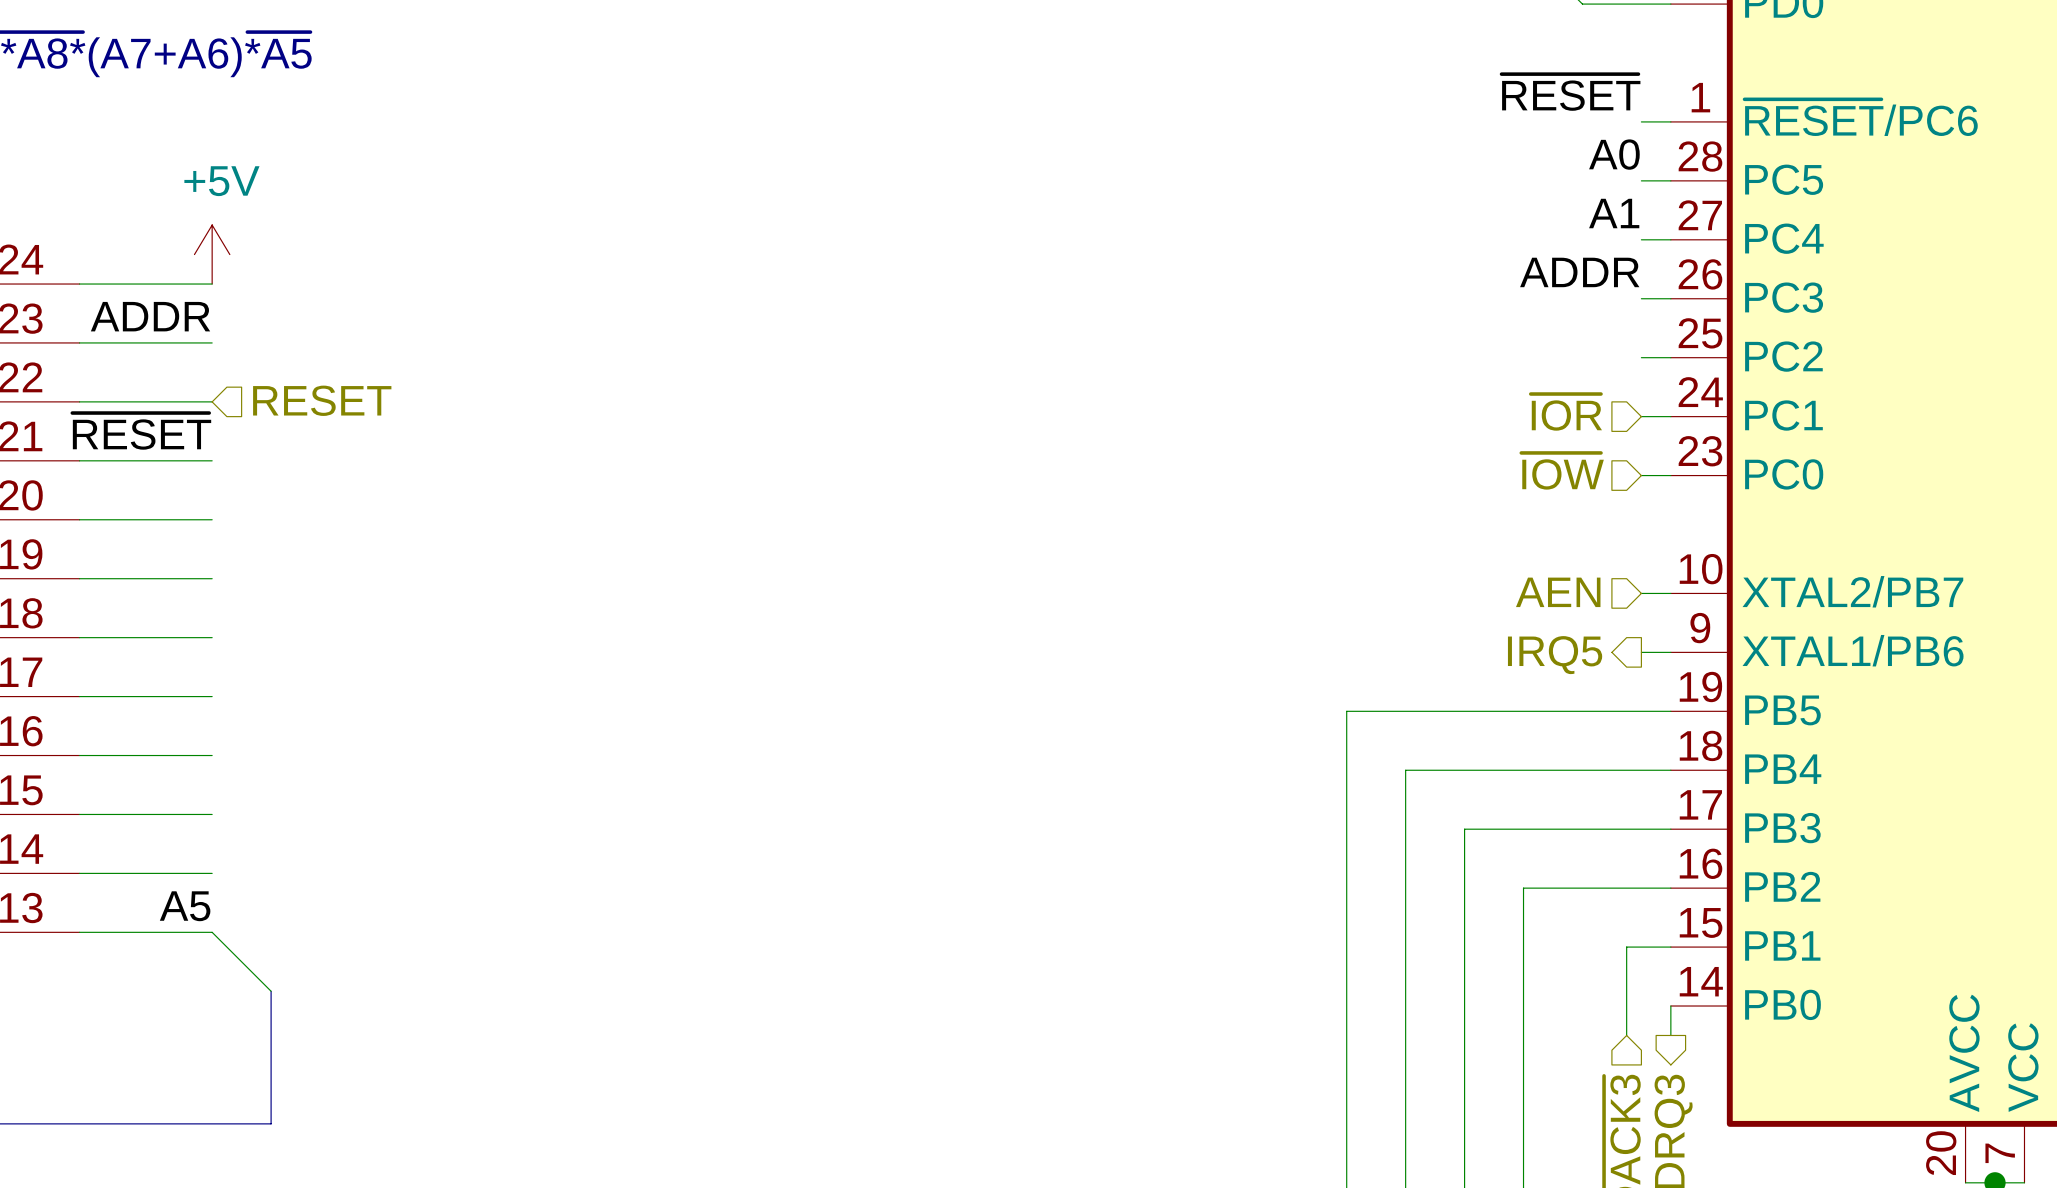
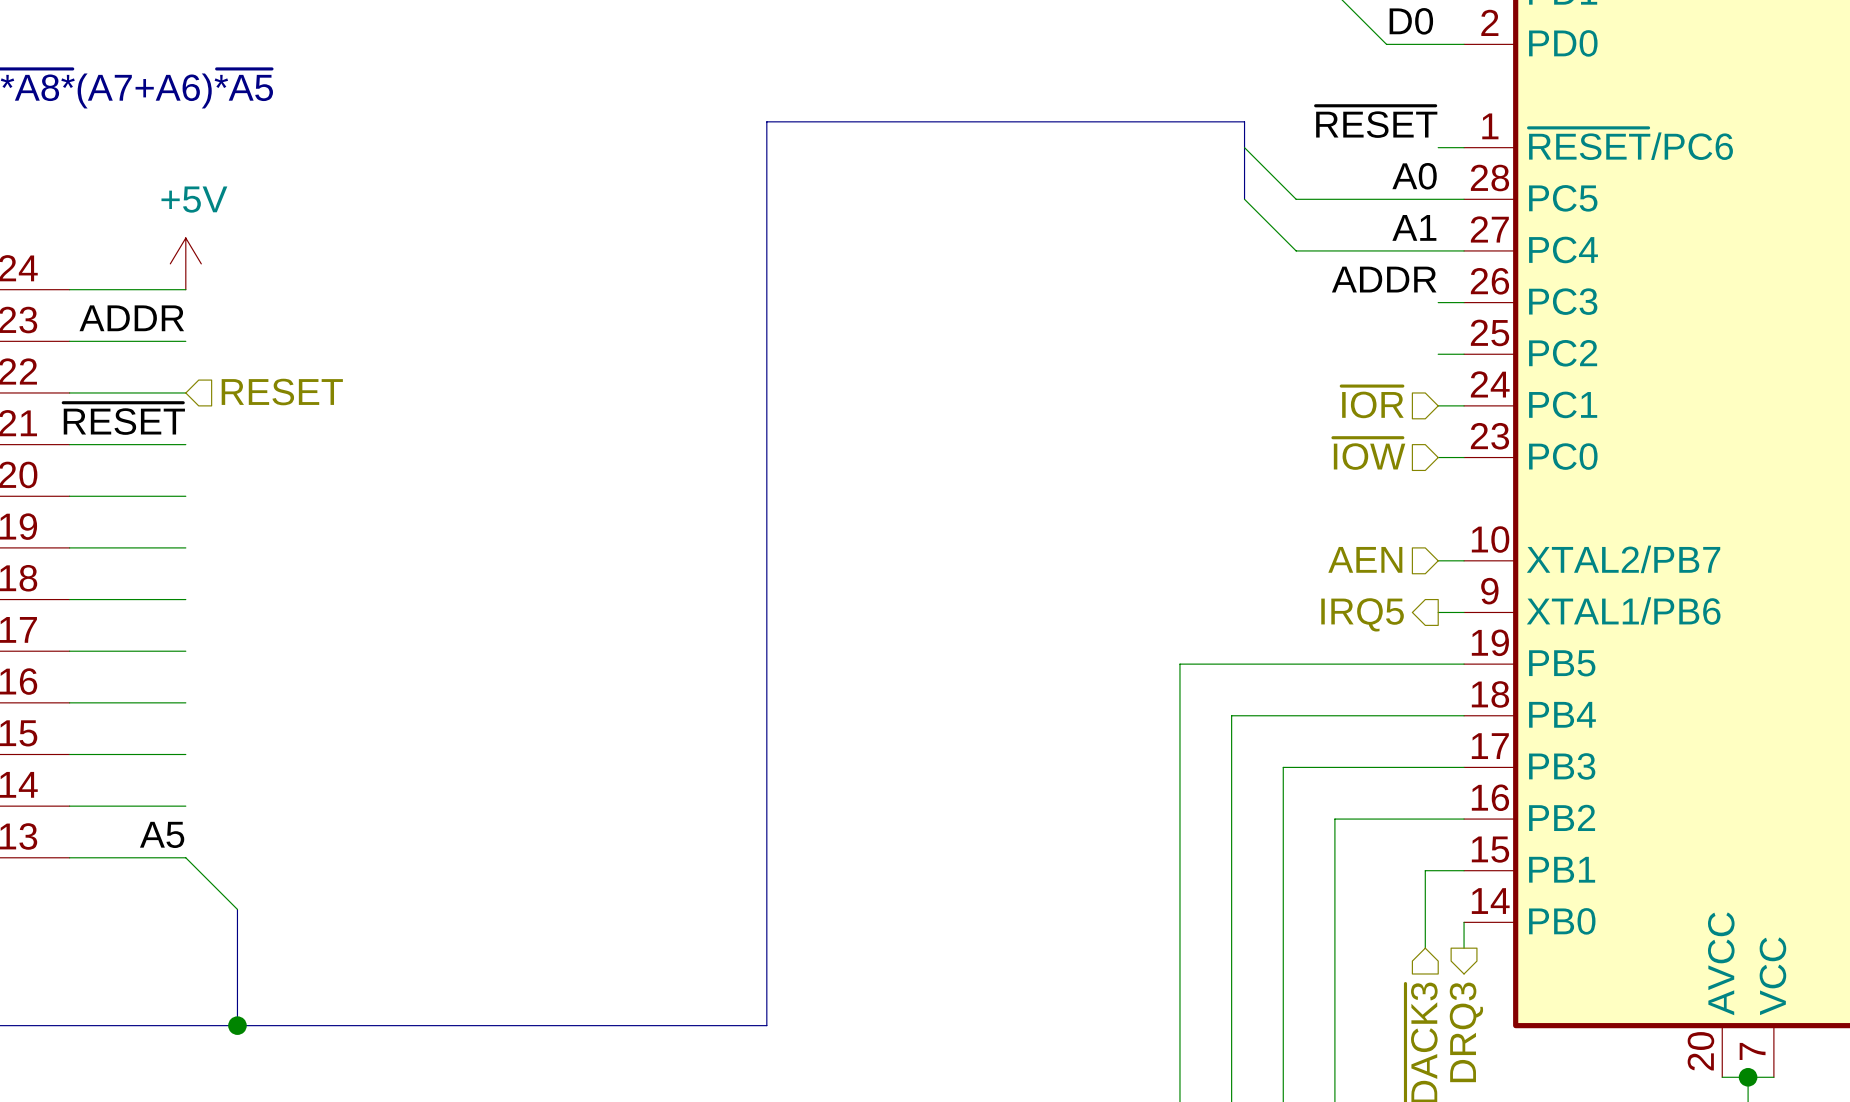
wire: none -> (1244, 147) (1296, 199) (1438, 199)
wire: none -> (1244, 199) (1296, 250) (1438, 250)
bus: none -> (1244, 199) (1244, 121) (766, 121) (766, 1025) (237, 1025)
junction: none -> (237, 1025)

